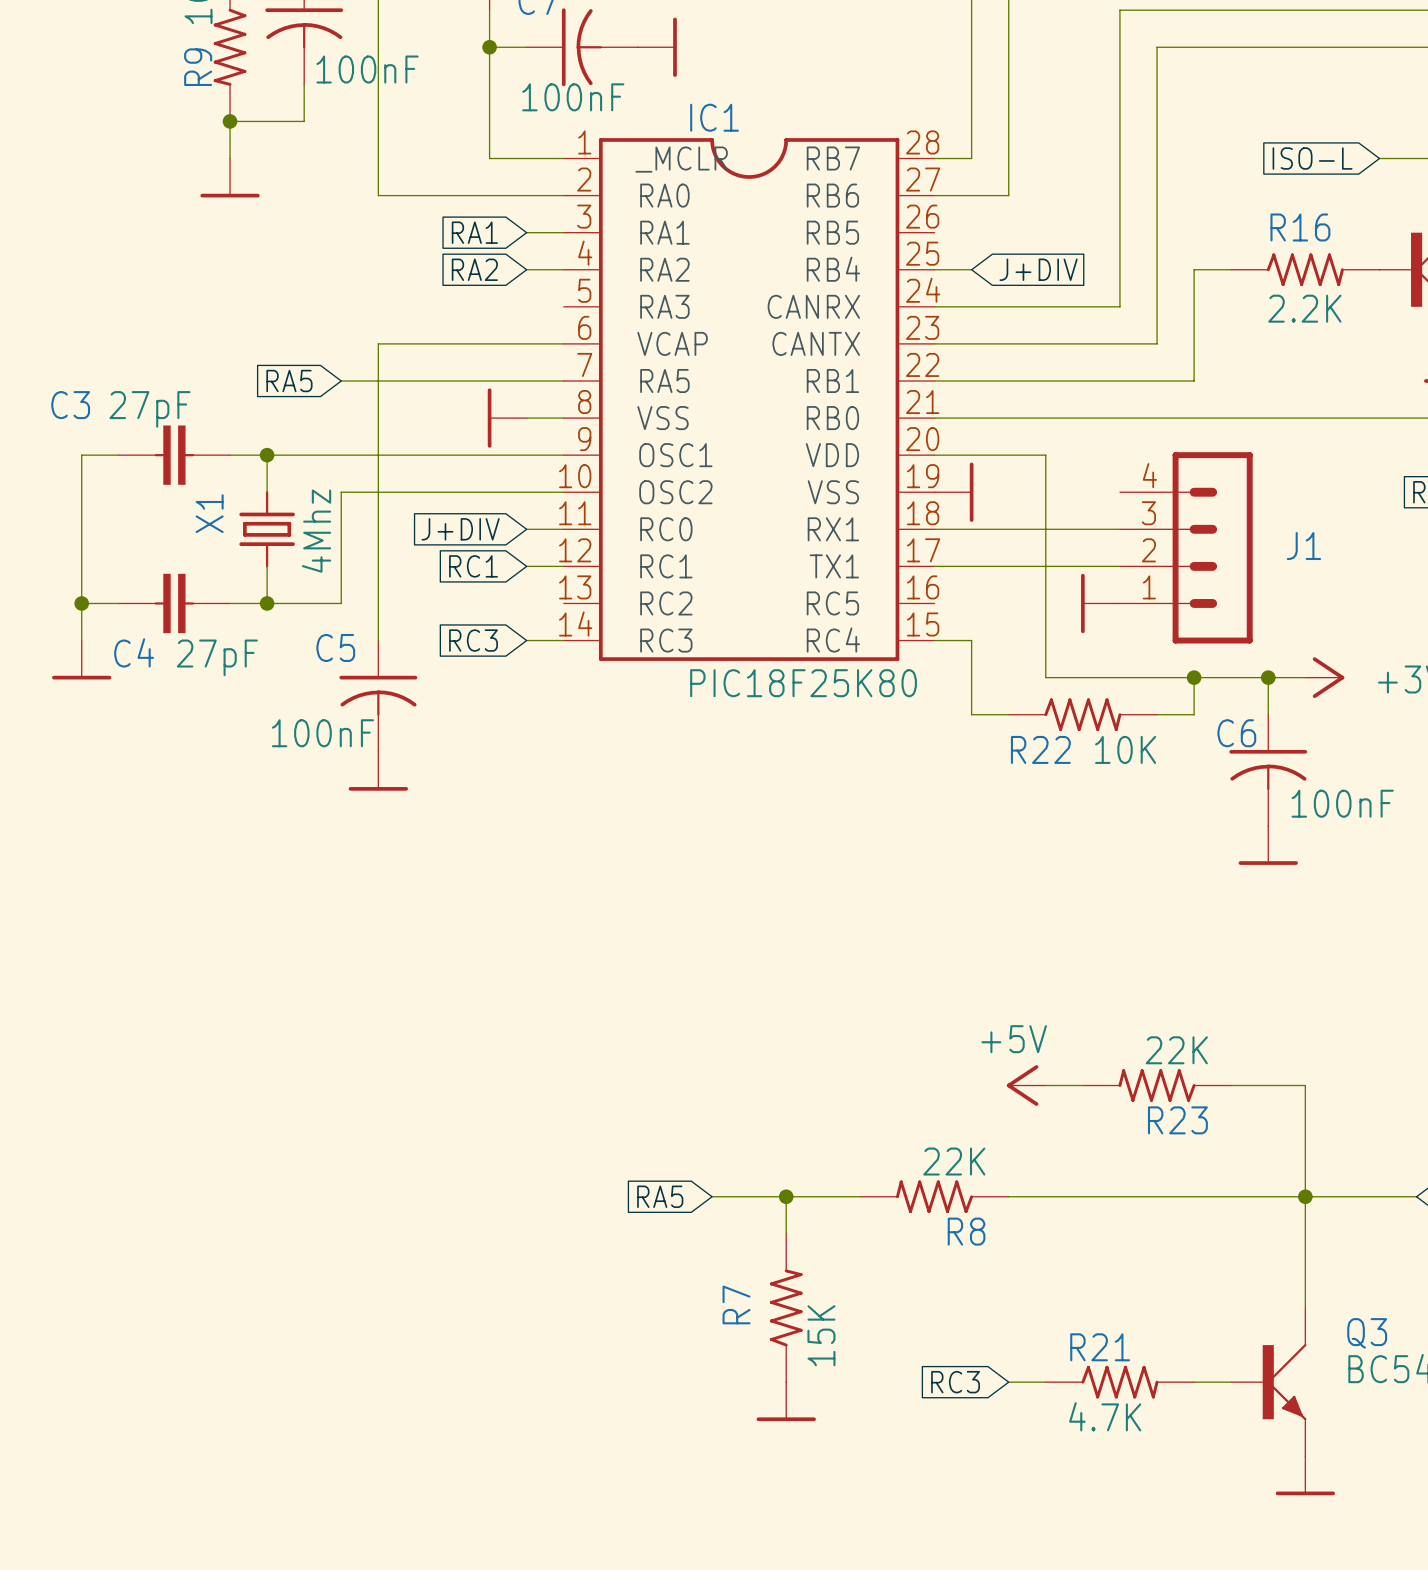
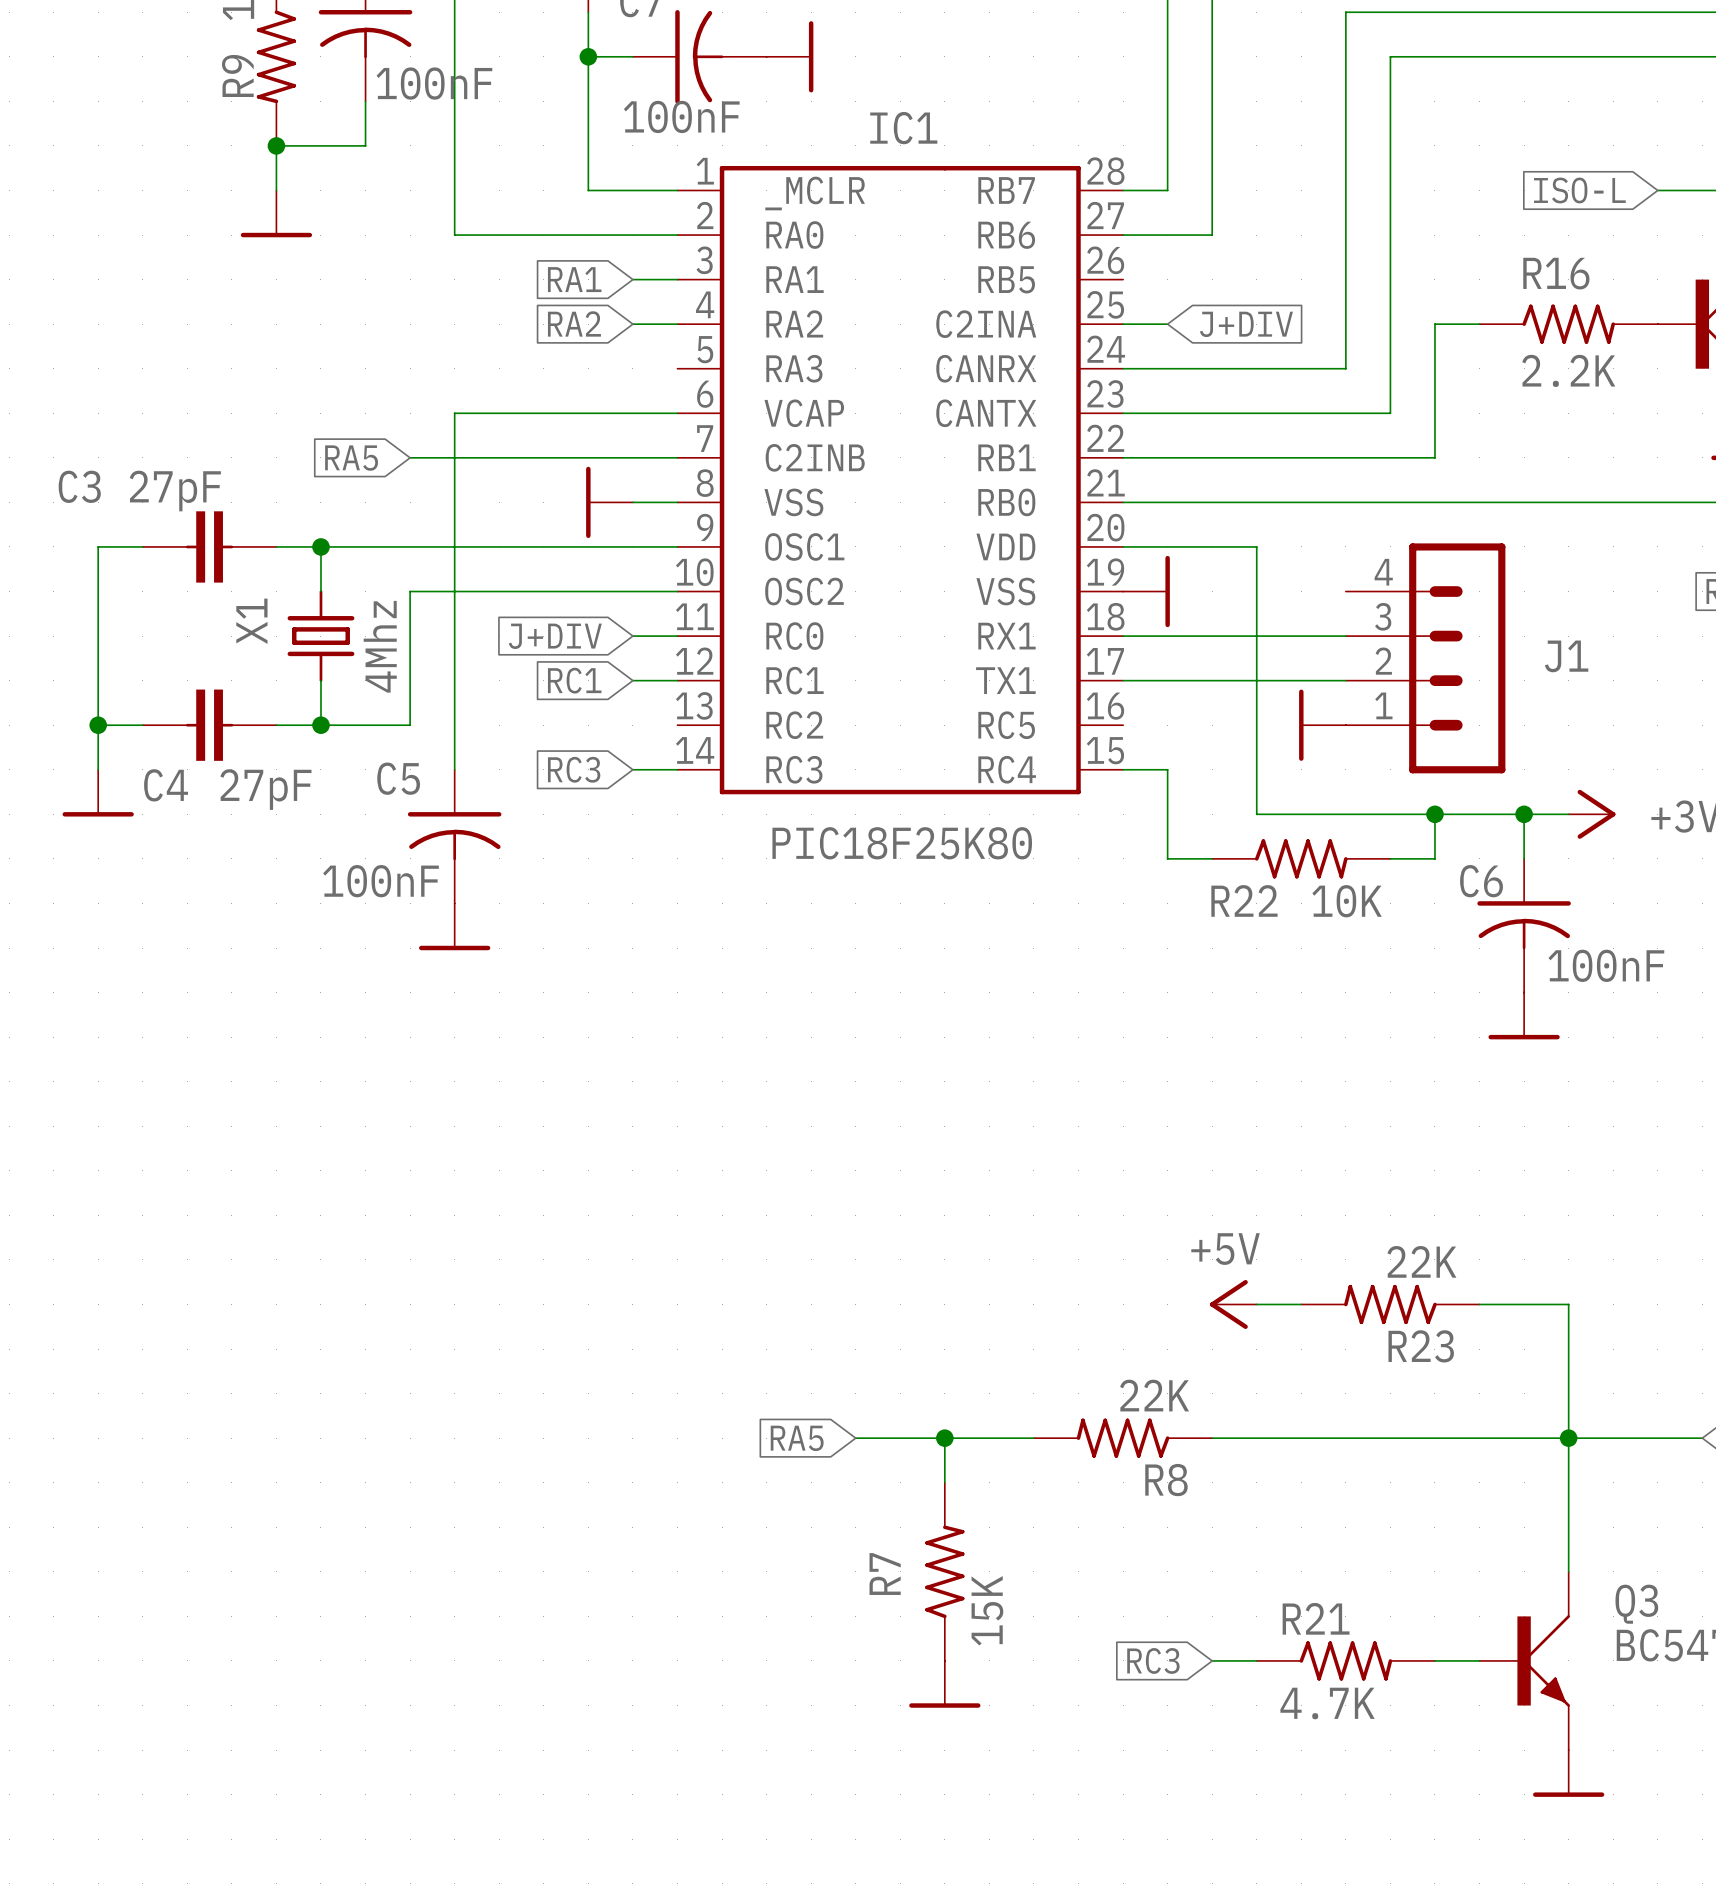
IC1 name position: IC1 (714, 117) -> IC1 (903, 128)
IC1 symbol: [563, 138, 935, 661] -> [677, 165, 1124, 795]
IC1 value position: PIC18F25K80 (803, 683) -> PIC18F25K80 (902, 843)

